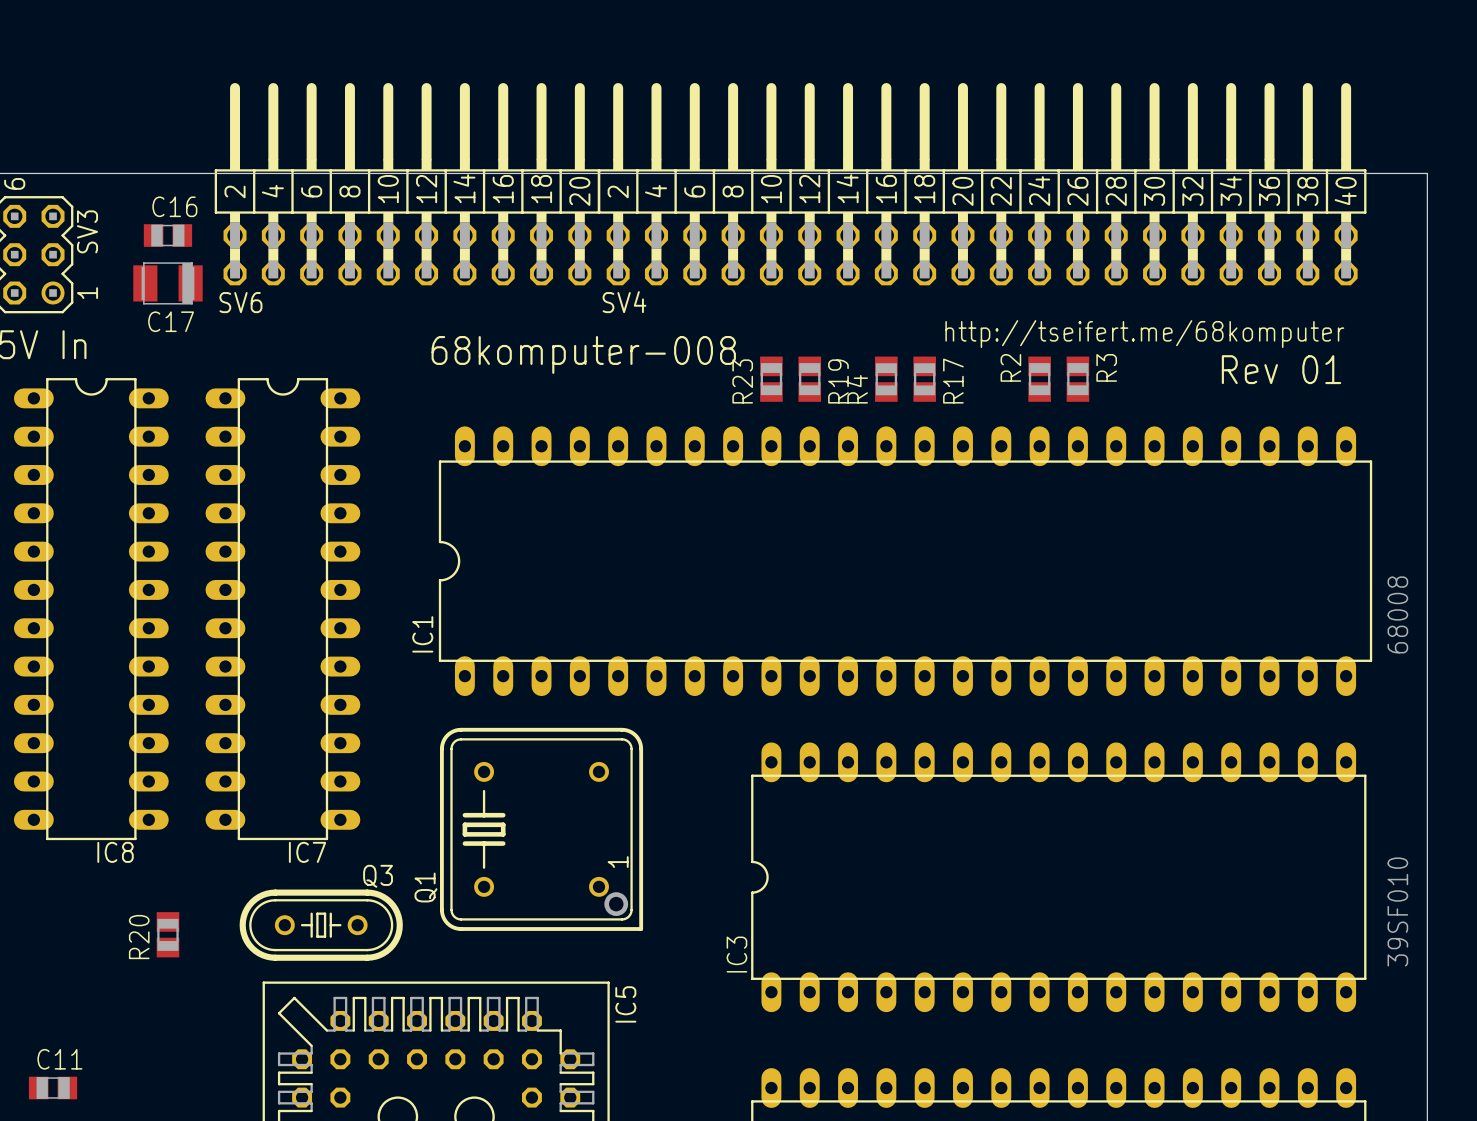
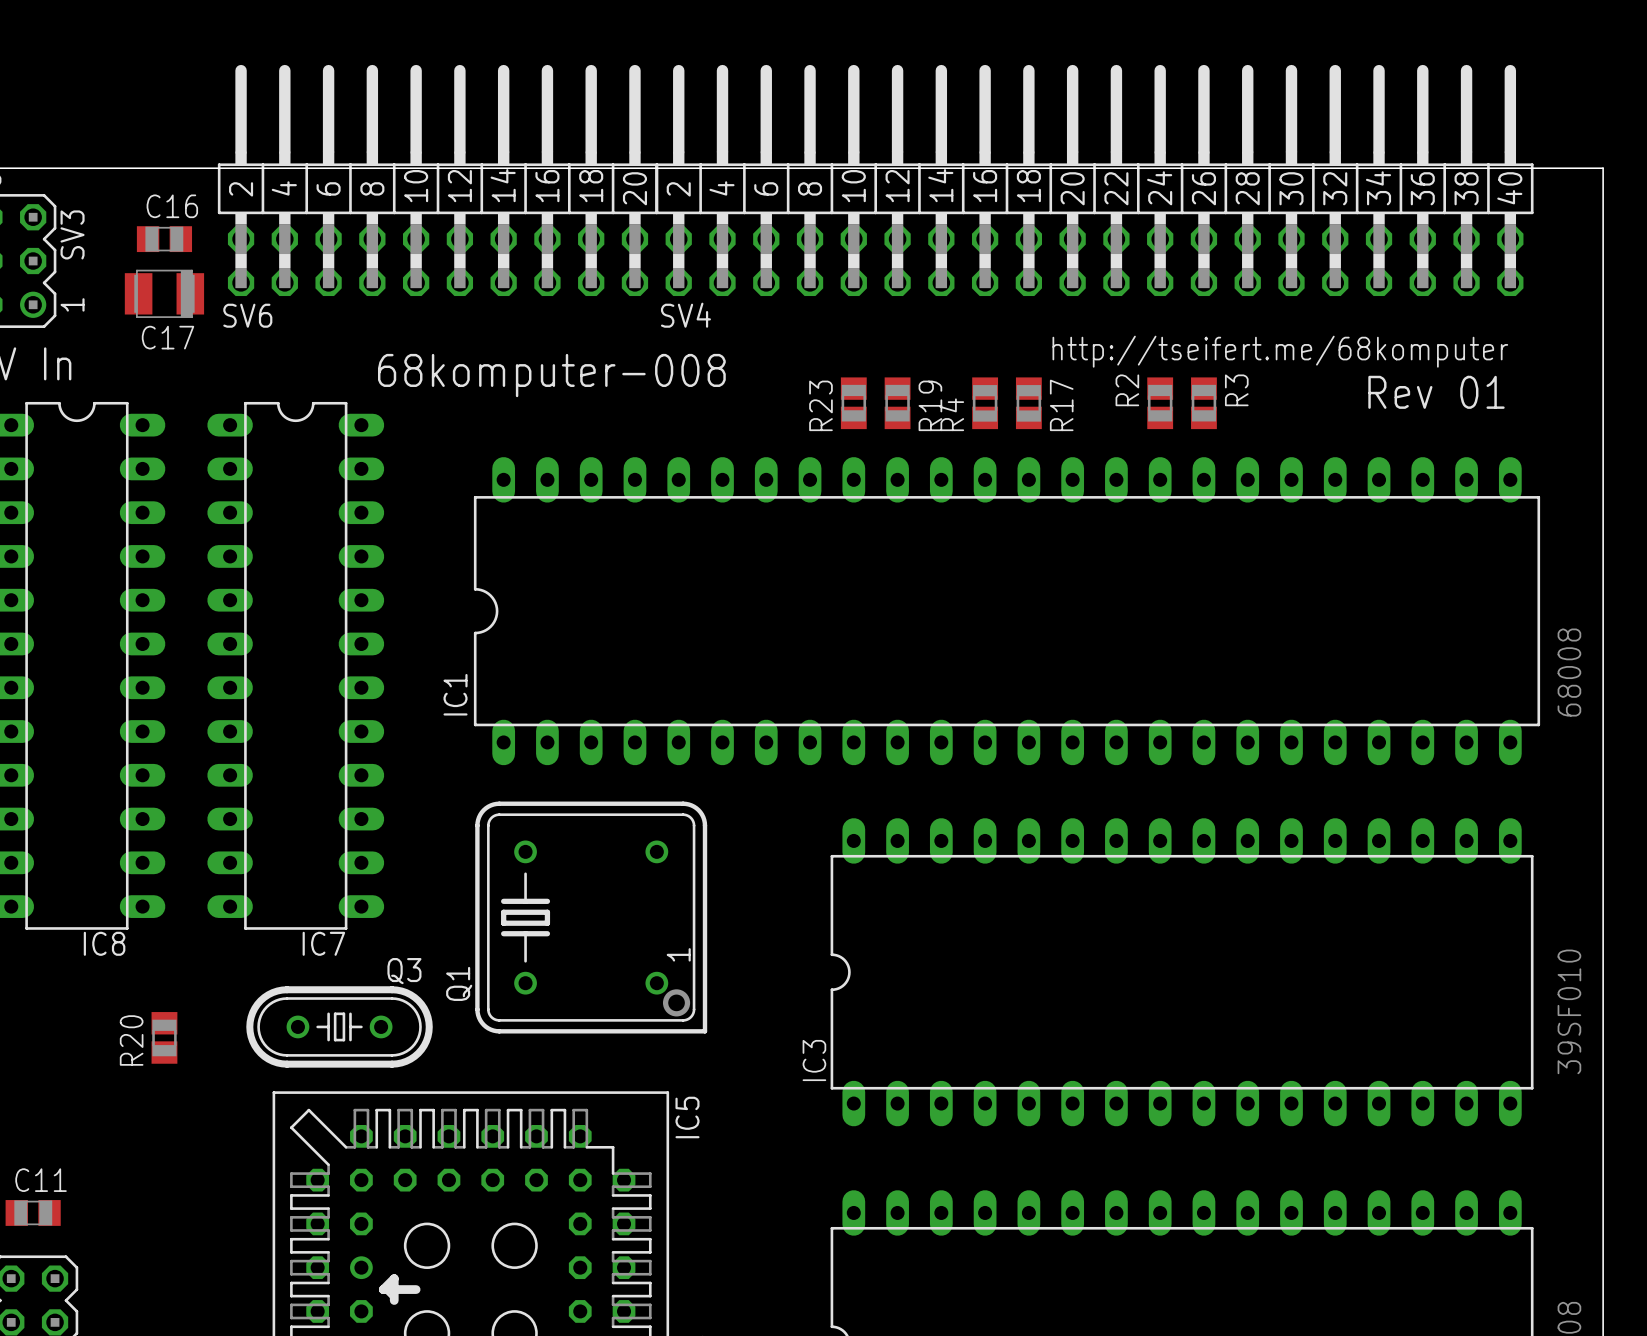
text position: 68komputer-008 (583, 354) -> 68komputer-008 (551, 375)

